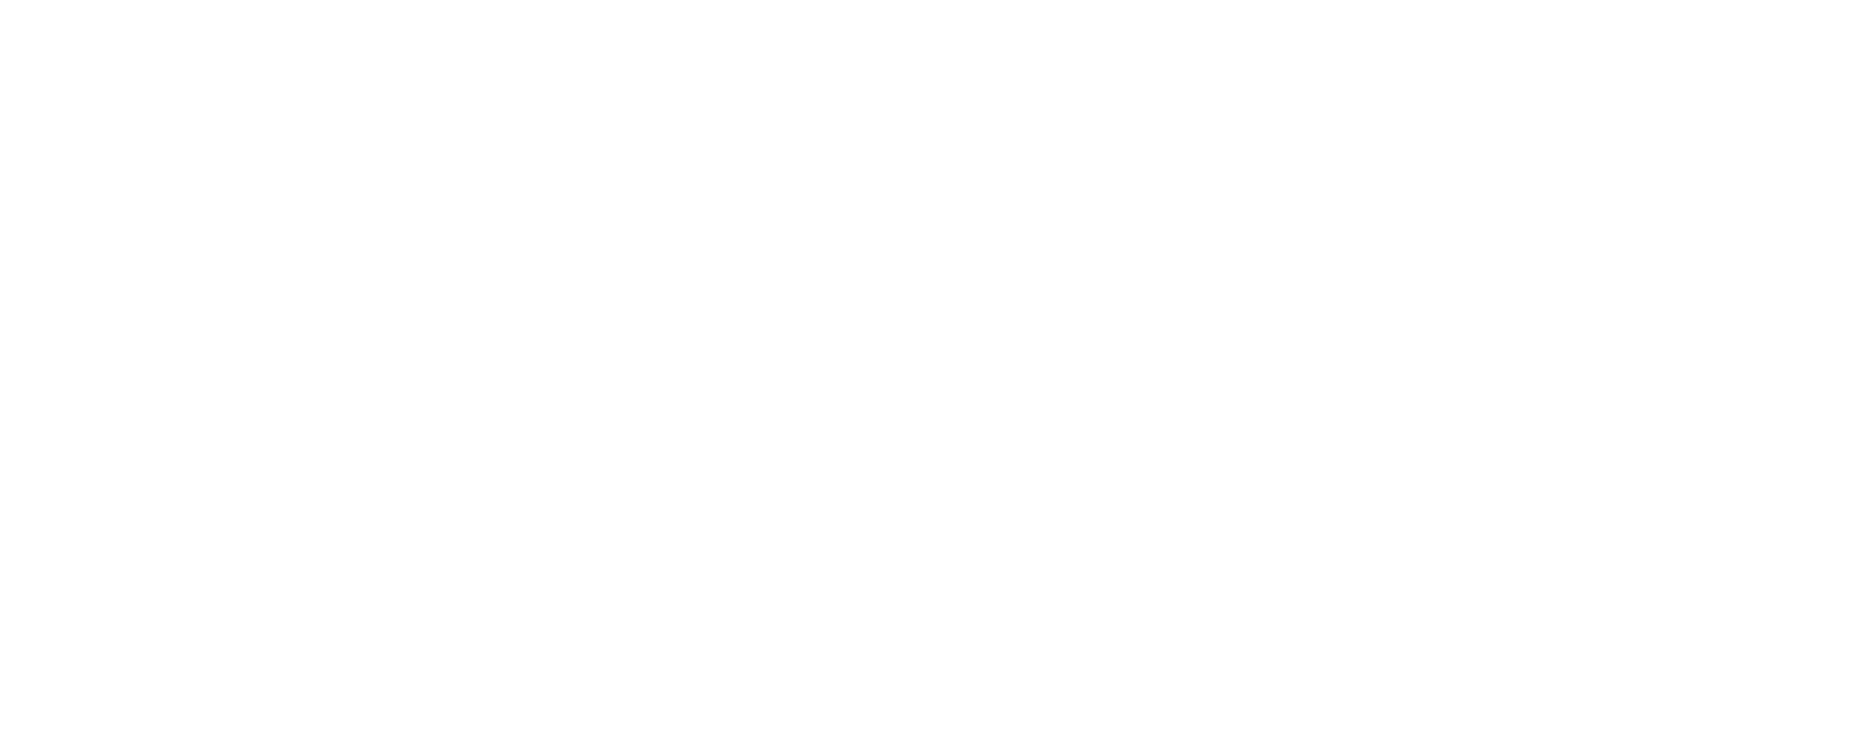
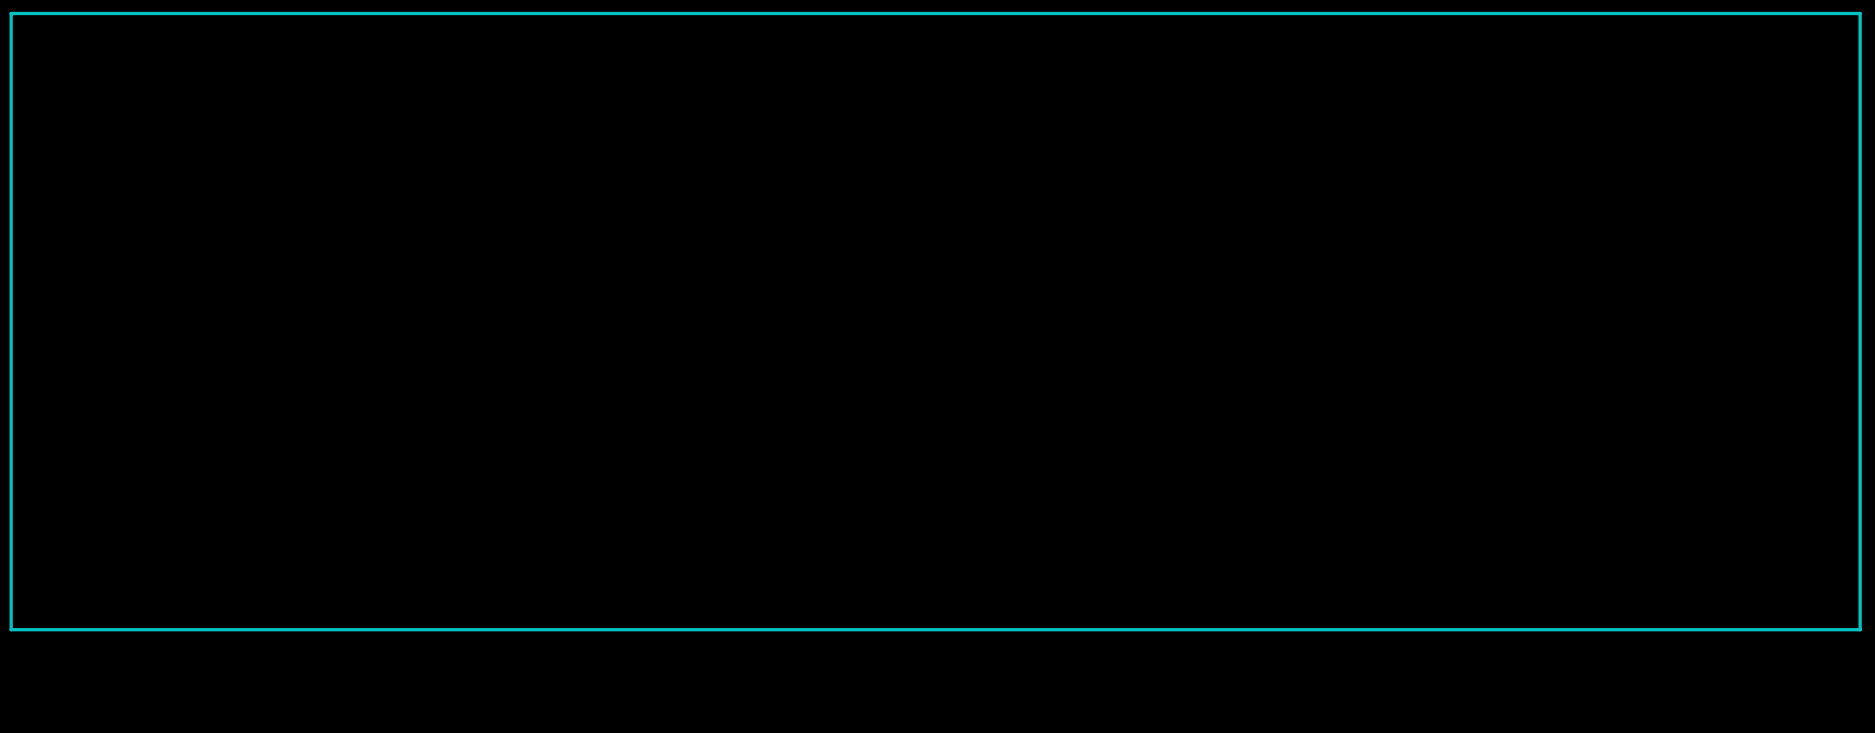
line: none -> (11, 13) (1860, 13) (1860, 629) (11, 629) (11, 13)

